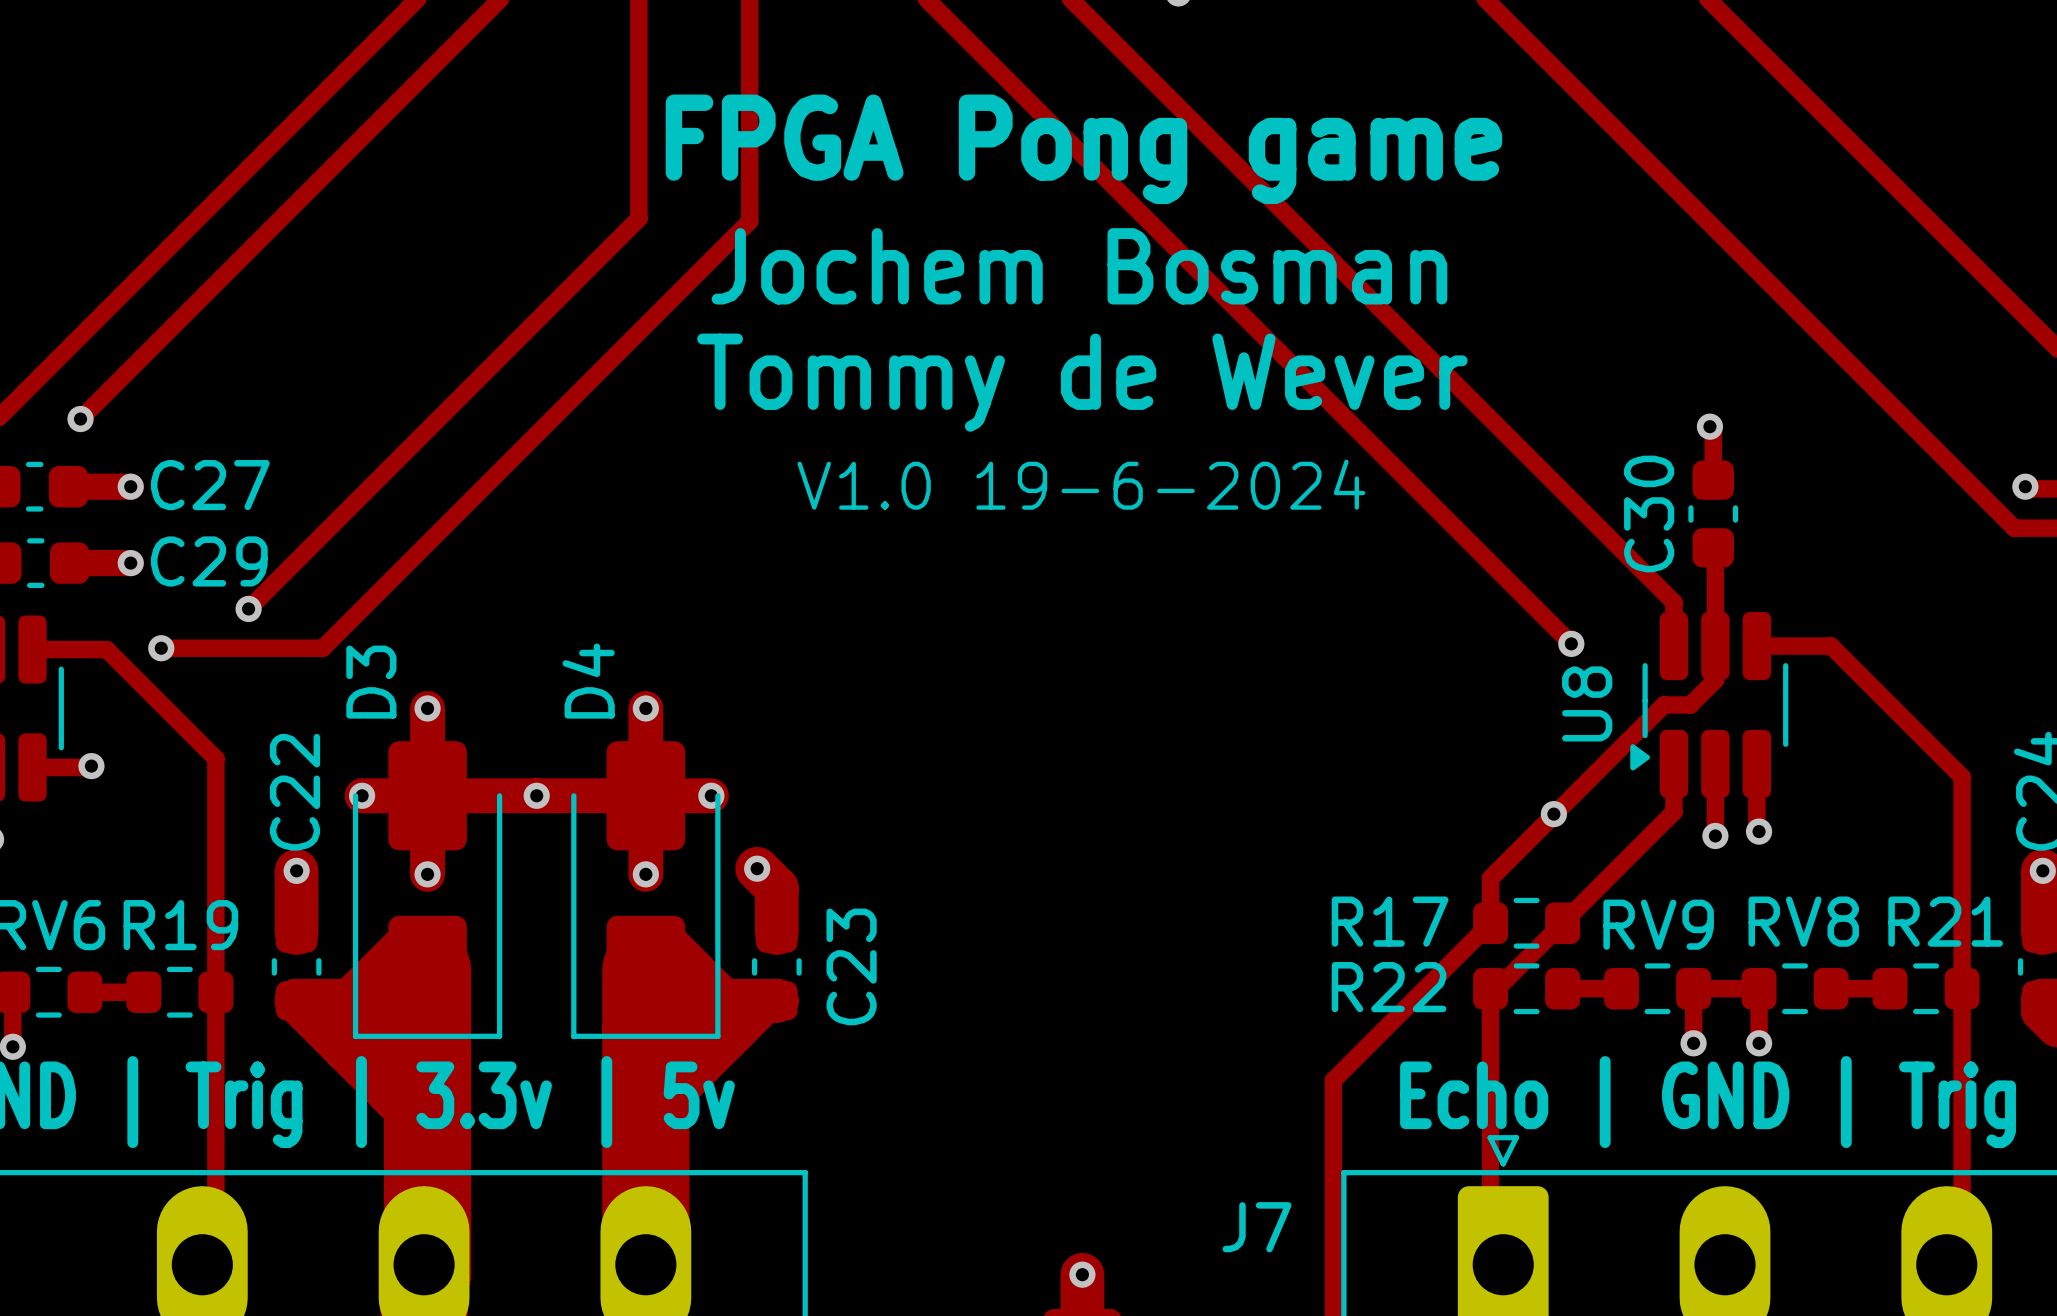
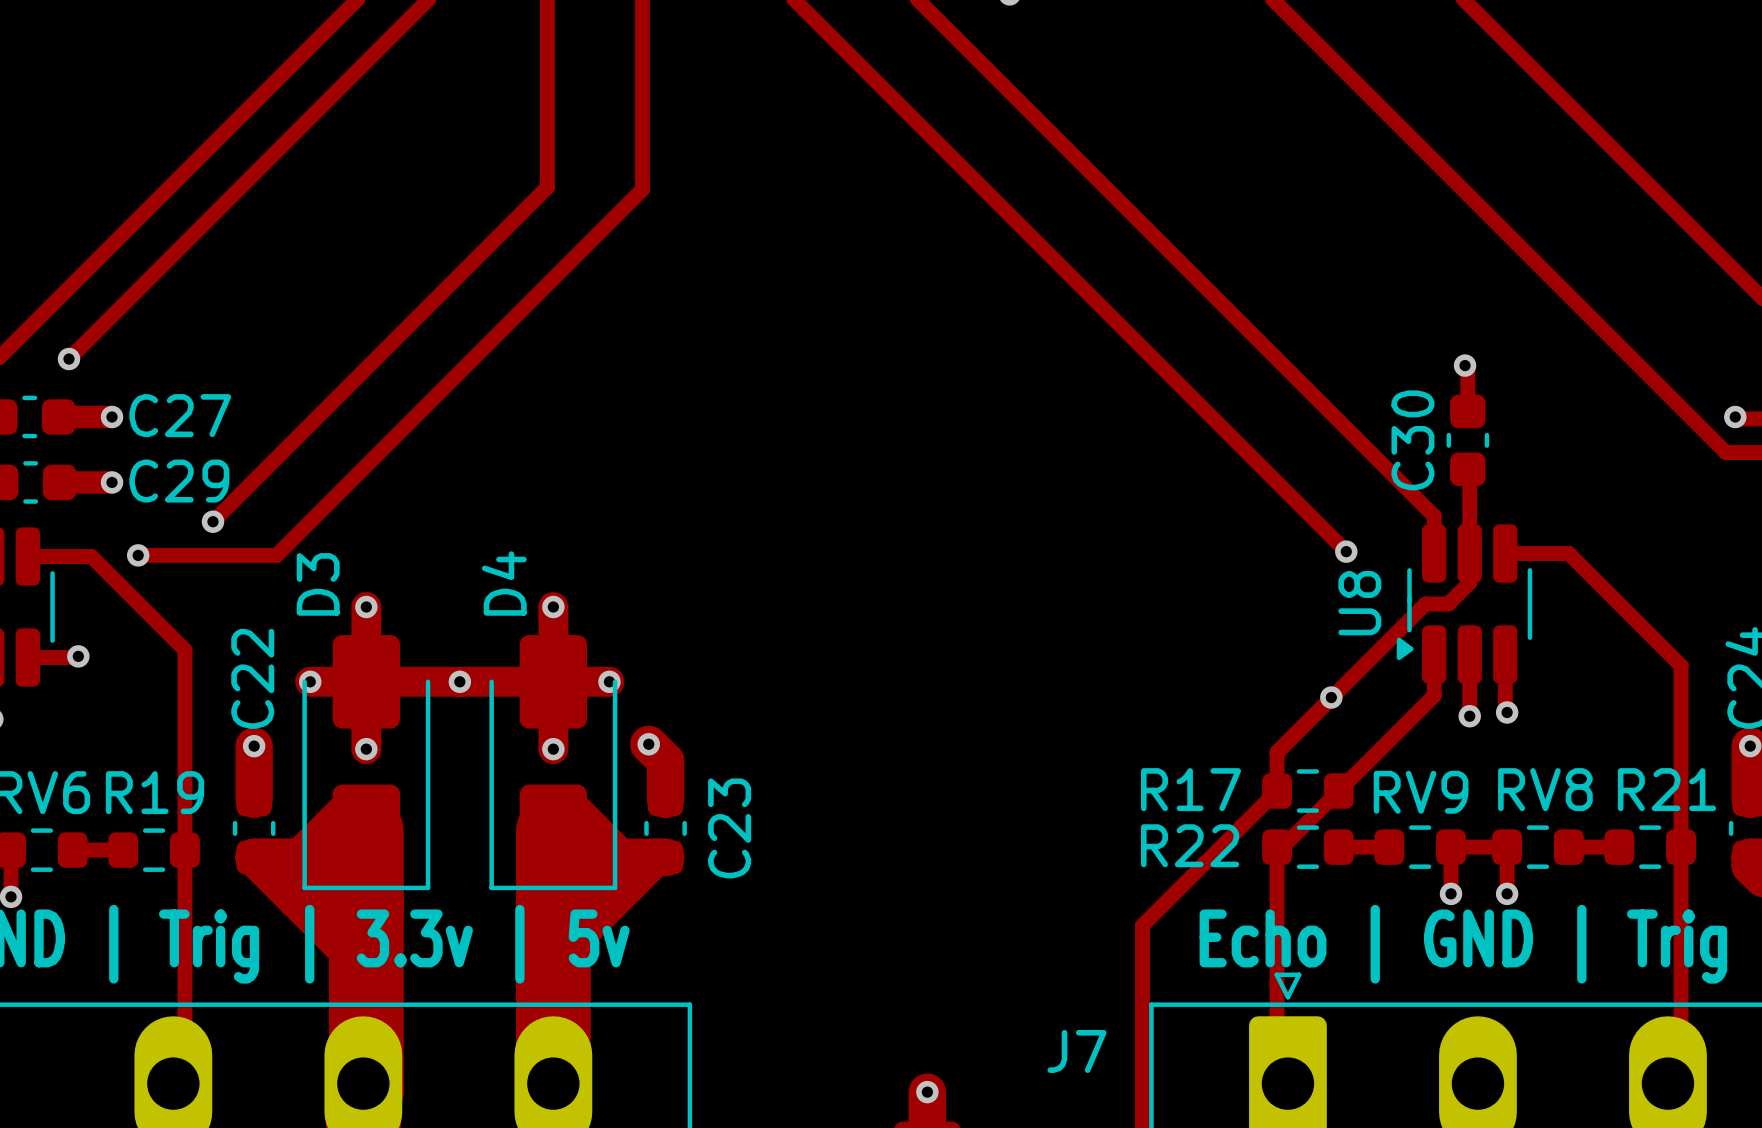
text: FPGA Pong game (1083, 149) -> none
text: Jochem Bosman (1079, 266) -> none
text: Tommy de Wever (1082, 382) -> none
text: V1.0 19-6-2024 (1081, 484) -> none

